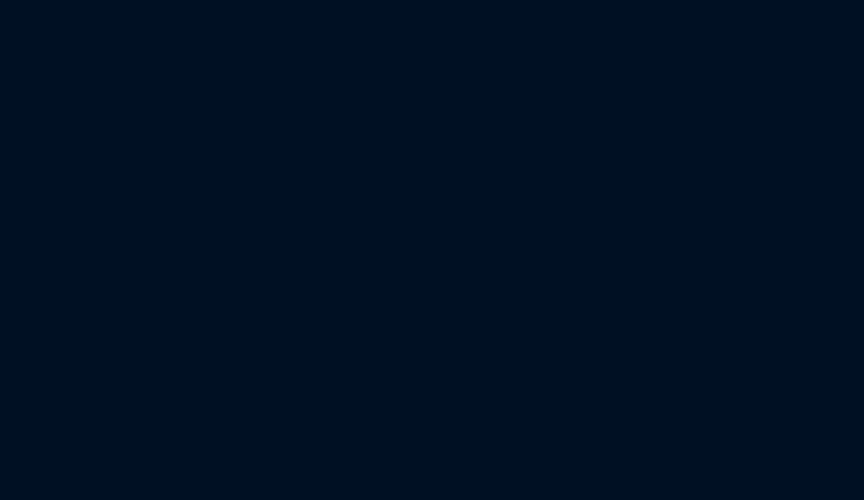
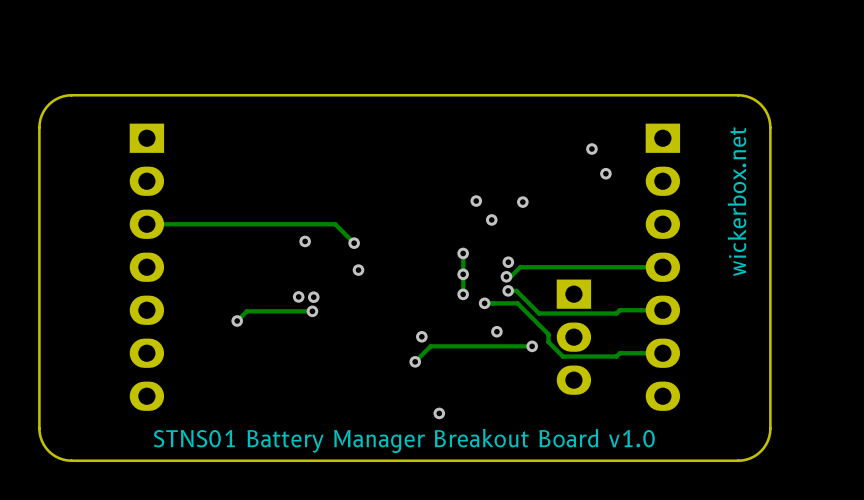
board edge: none -> (738, 95) (71, 95) (55, 99) (43, 111) (39, 127) (39, 428) (43, 444) (55, 456) (71, 460) (738, 460) (754, 456) (766, 444) (770, 428) (770, 127) (767, 115) (760, 104) (750, 97) (738, 95)
via: none -> (591, 149)
via: none -> (605, 173)
via: none -> (476, 201)
text: none -> wickerbox.net (737, 201)
via: none -> (522, 202)
via: none -> (491, 219)
track: none -> (146, 224) (335, 224) (354, 243)
via: none -> (305, 241)
via: none -> (354, 243)
track: none -> (463, 253) (463, 294)
via: none -> (463, 253)
via: none -> (508, 262)
part: none -> (146, 267)
track: none -> (662, 267) (520, 267) (510, 276) (506, 276)
part: none -> (662, 267)
via: none -> (358, 270)
via: none -> (463, 274)
via: none -> (506, 276)
track: none -> (508, 290) (516, 290) (539, 313) (616, 313) (619, 310) (662, 310)
via: none -> (508, 290)
via: none -> (463, 294)
via: none -> (298, 296)
via: none -> (313, 297)
track: none -> (484, 303) (517, 303) (548, 334) (548, 342) (562, 356) (616, 356) (619, 353) (662, 353)
via: none -> (484, 303)
track: none -> (312, 311) (246, 311) (237, 320)
via: none -> (312, 311)
via: none -> (237, 320)
via: none -> (496, 331)
via: none -> (421, 336)
part: none -> (573, 337)
track: none -> (532, 346) (430, 346) (415, 361)
via: none -> (532, 346)
via: none -> (415, 361)
via: none -> (439, 413)
text: none -> STNS01 Battery Manager Breakout Board v1.0 (404, 440)

